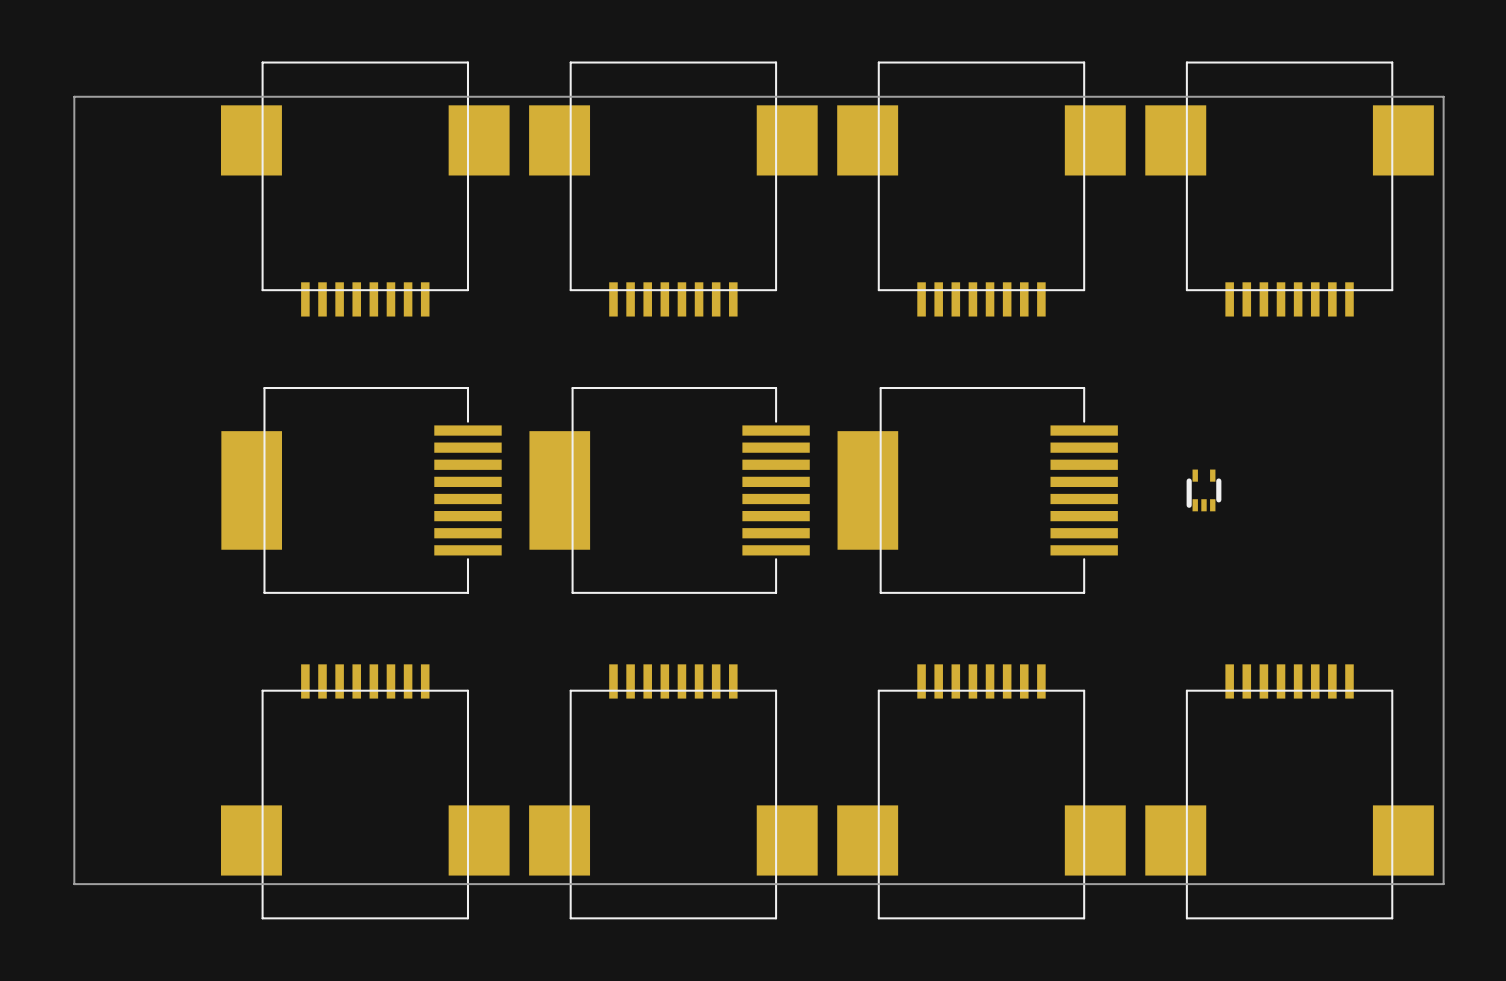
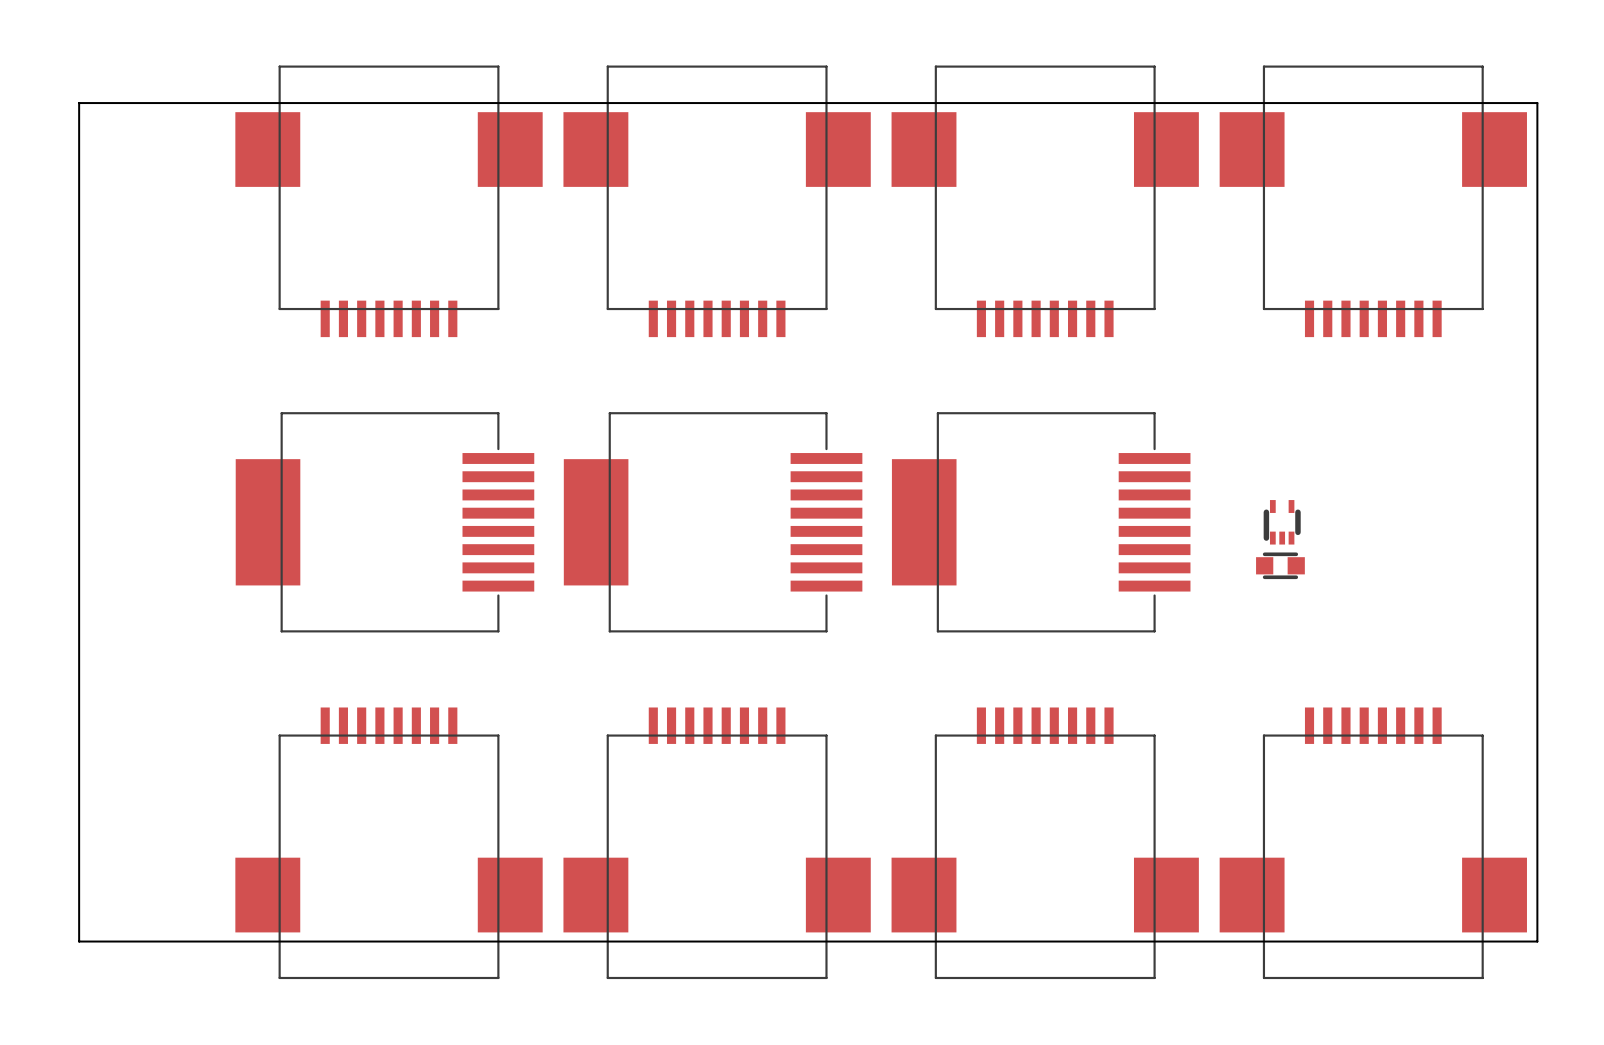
part: none -> (1280, 565)

